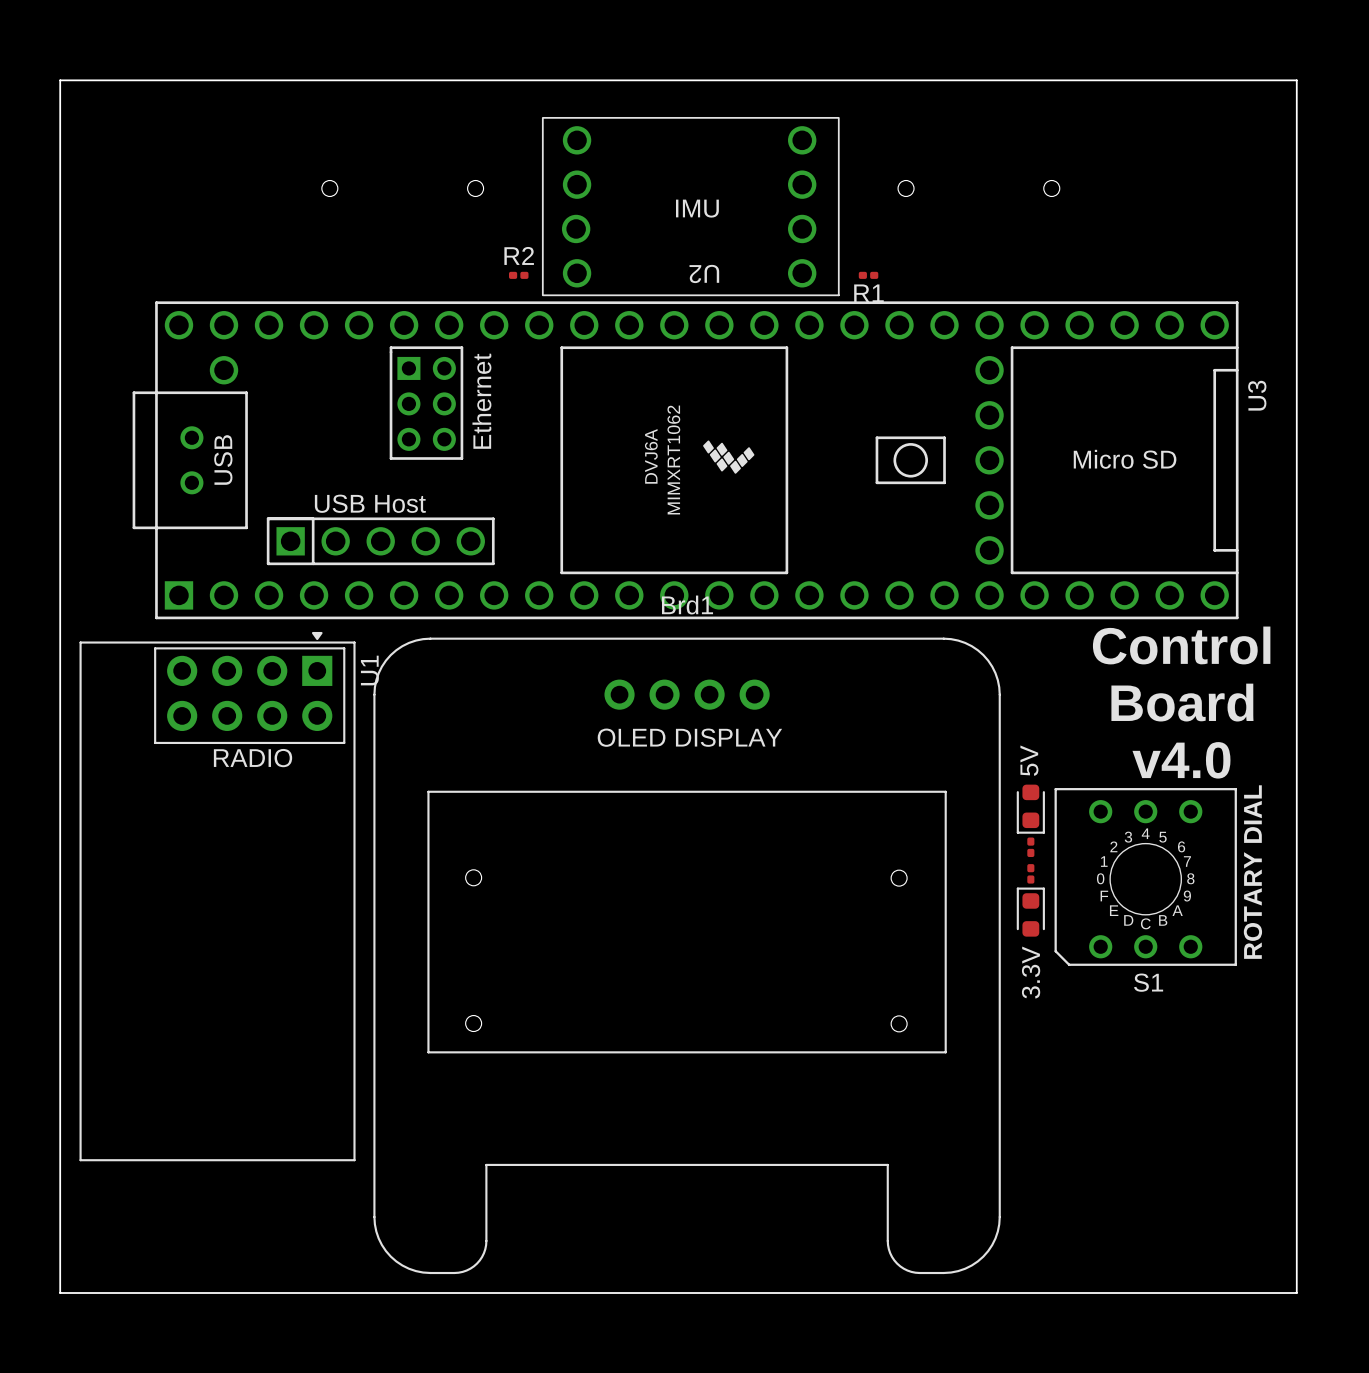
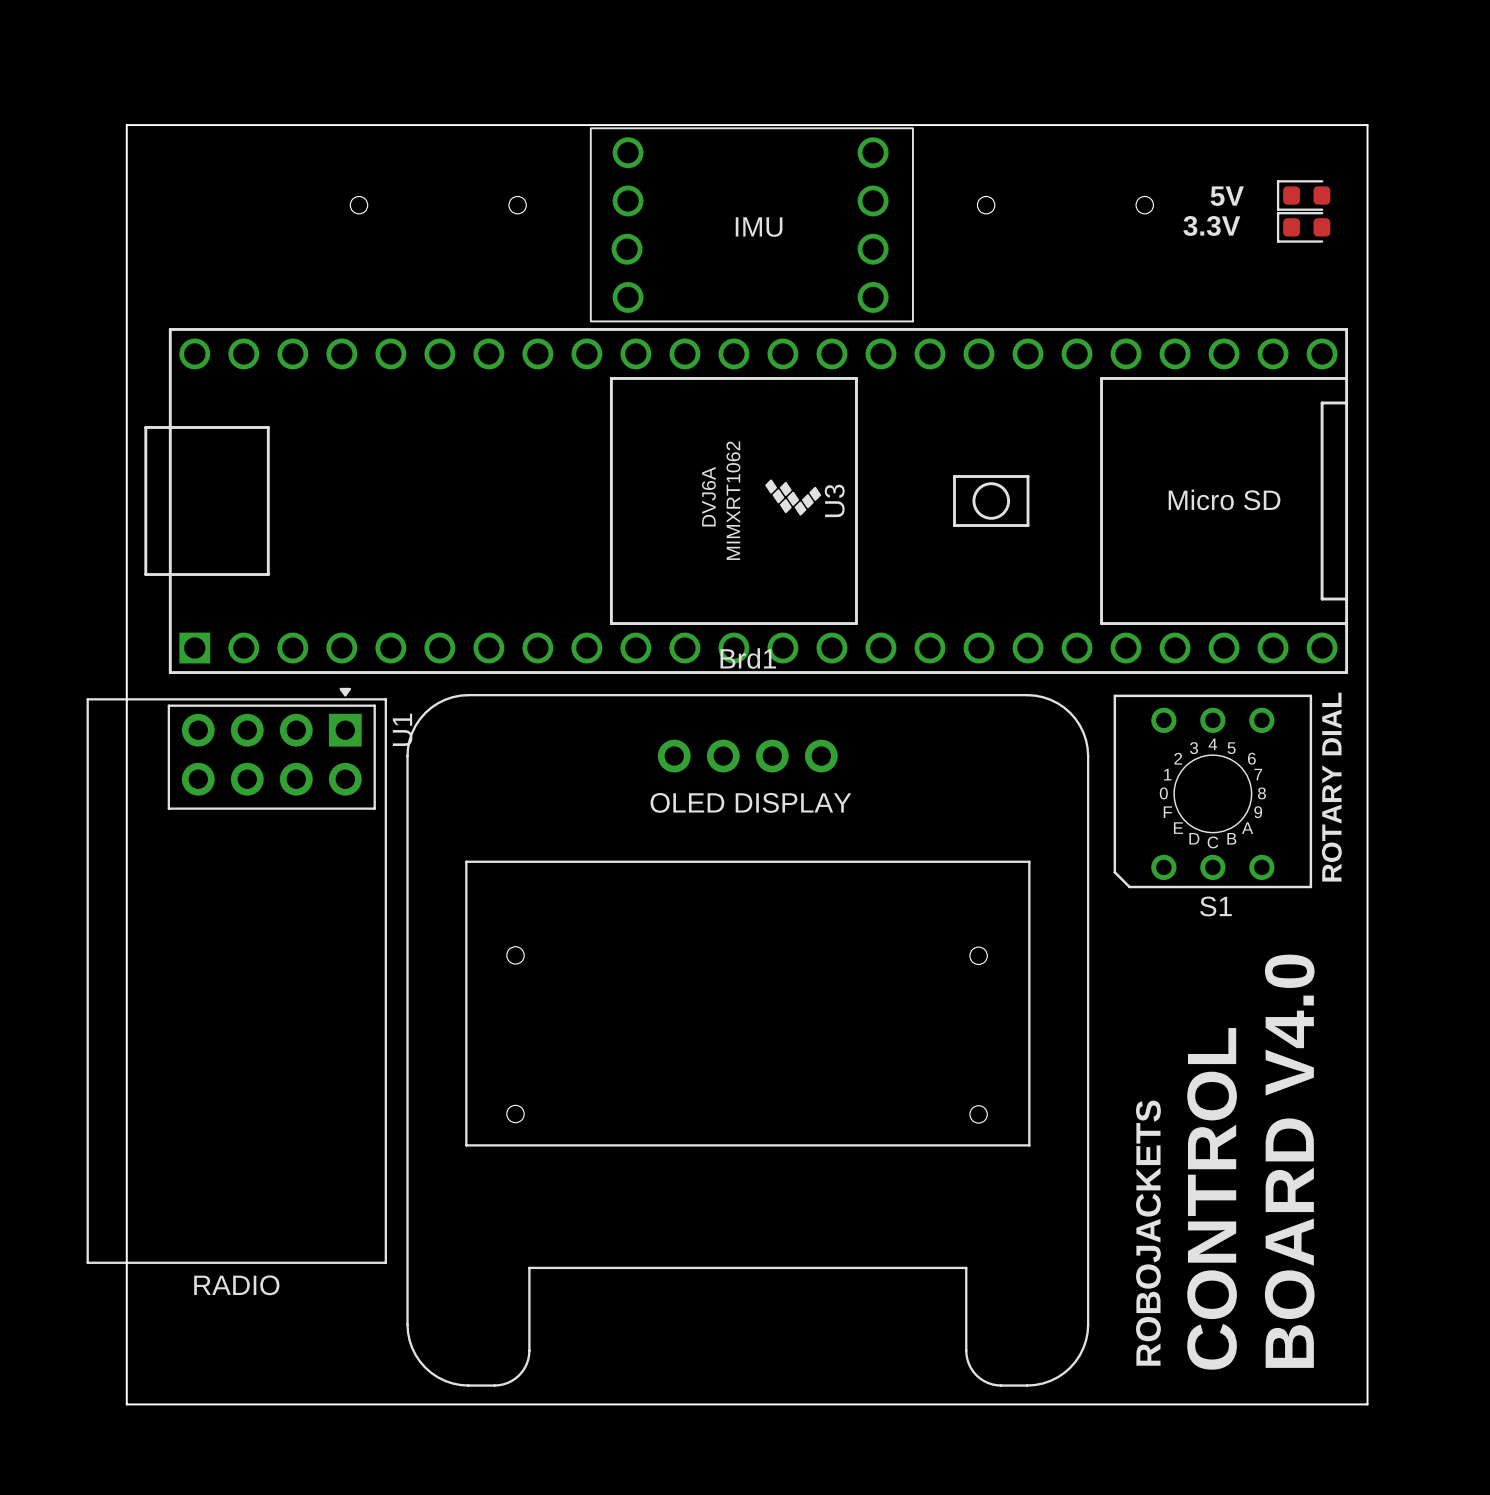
board edge: (60, 80) (1296, 80) (1296, 1293) (60, 1293) (60, 80) -> (126, 125) (126, 1404) (1367, 1404) (1367, 125) (126, 125)
part: none -> (1303, 195)
text: none -> 5V (1227, 196)
text: none -> 3.3V (1211, 225)
part: none -> (1303, 227)
U2 name: U2 (704, 273) -> none
R2: (518, 275) -> none
R1: (868, 275) -> none
U3 footprint: [132, 301, 1239, 620] -> [144, 328, 1349, 674]
U3 name position: U3 (1257, 395) -> U3 (834, 500)
text: Control (1181, 645) -> none
text: Board (1182, 702) -> none
text position: RADIO (253, 758) -> RADIO (236, 1285)
text: v4.0 (1181, 760) -> none
5V: (1030, 809) -> none
part: (1030, 847) -> none
text position: ROTARY DIAL (1252, 872) -> ROTARY DIAL (1331, 787)
part: (1030, 873) -> none
S1 position: (1145, 876) -> (1212, 791)
3.3V: (1030, 912) -> none
text: none -> BOARD V4.0 (1289, 1161)
text: none -> CONTROL (1212, 1198)
text: none -> ROBOJACKETS (1148, 1233)

